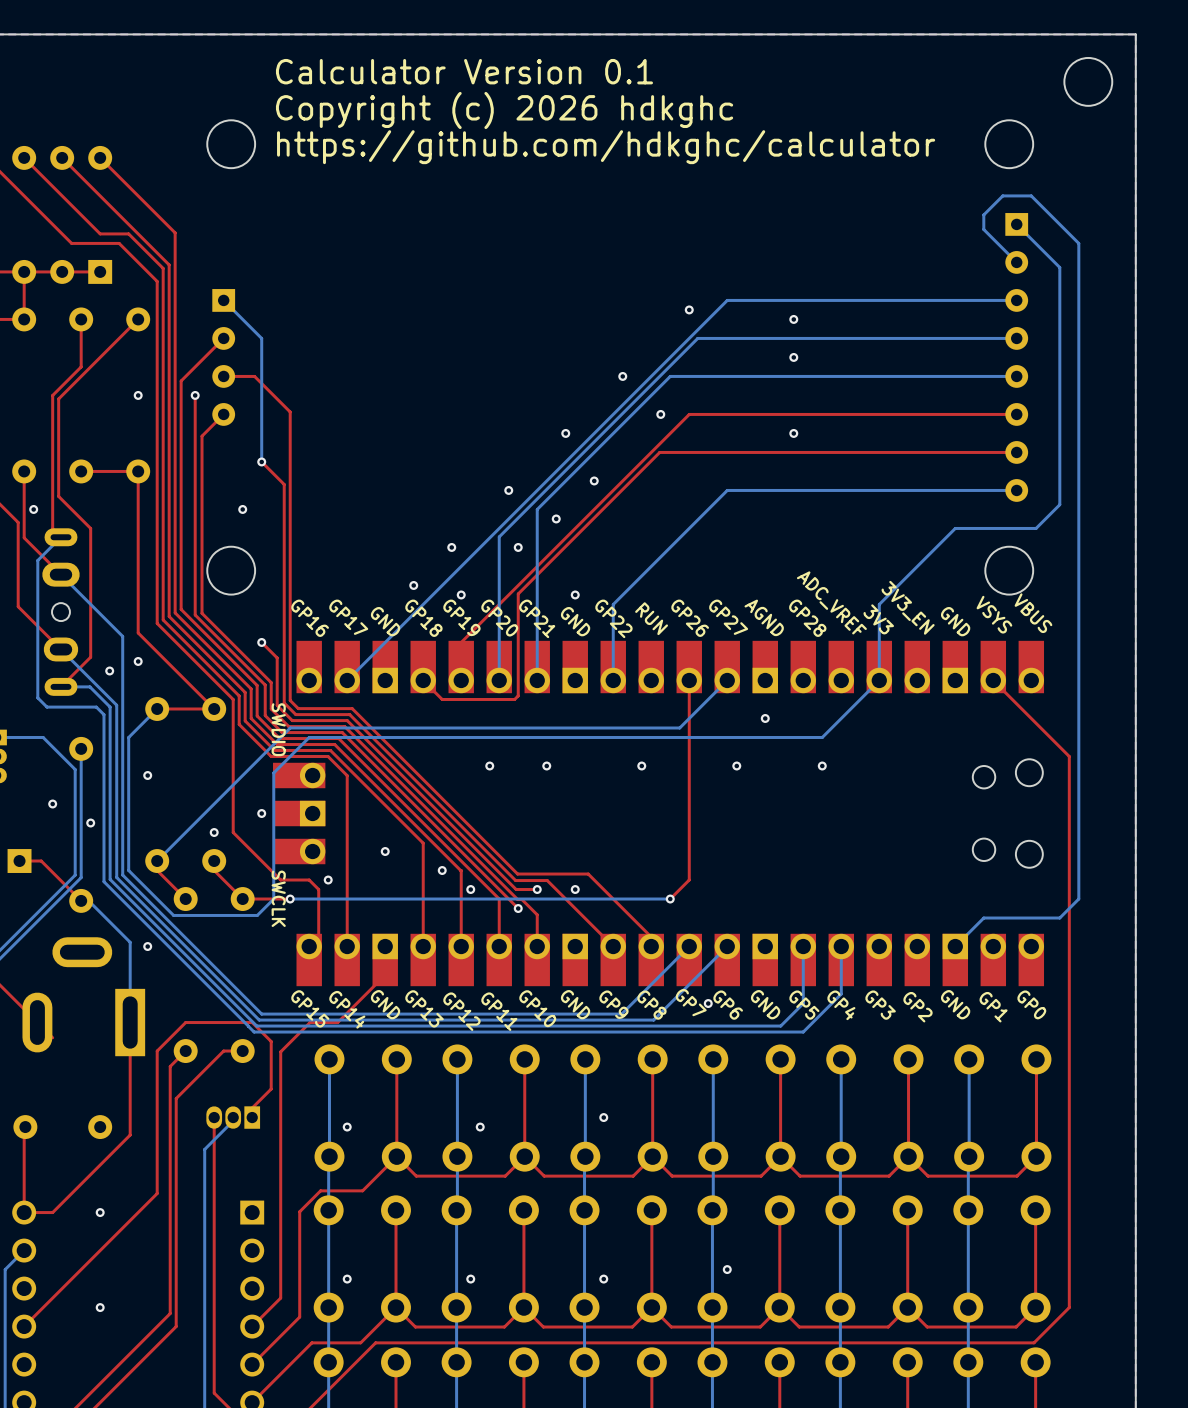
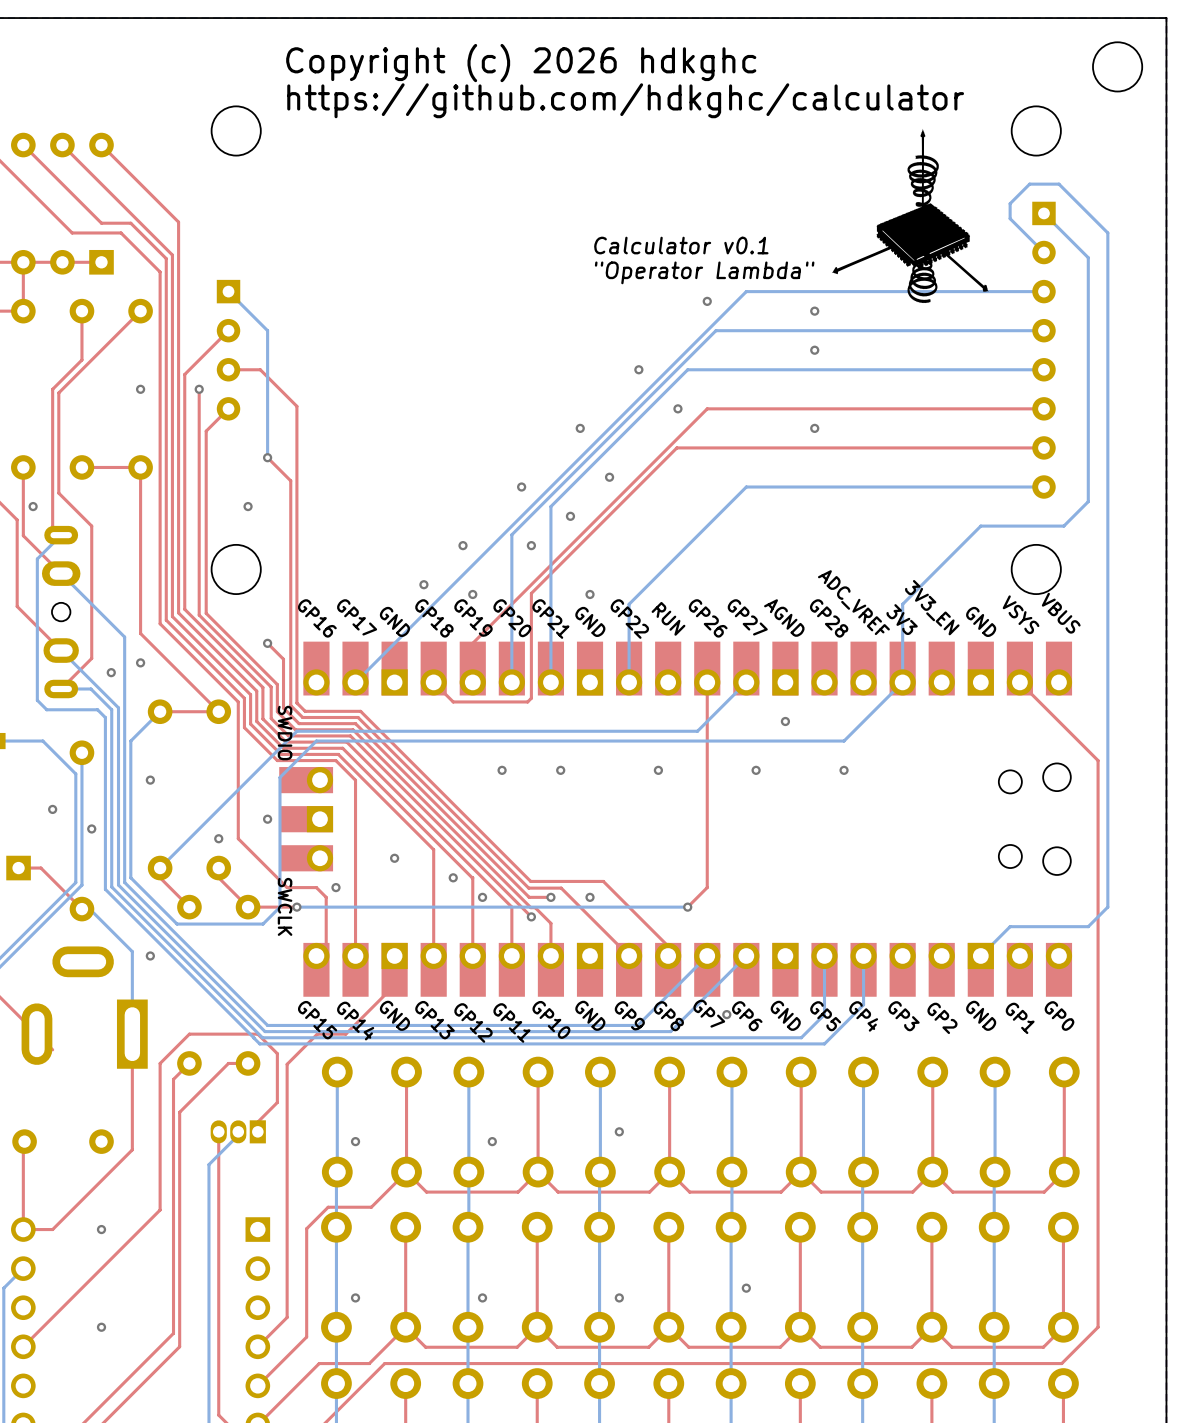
text: Calculator Version 0.1 (464, 71) -> Copyright (c) 2026 hdkghc (521, 63)
text: Copyright (c) 2026 hdkghc (504, 110) -> https://github.com/hdkghc/calculator (625, 100)
drawing: none -> [831, 128, 989, 304]
text: https://github.com/hdkghc/calculator (606, 147) -> none
text: none -> Calculator v0.1 (681, 245)
text: none -> "Operator Lambda" (704, 272)

